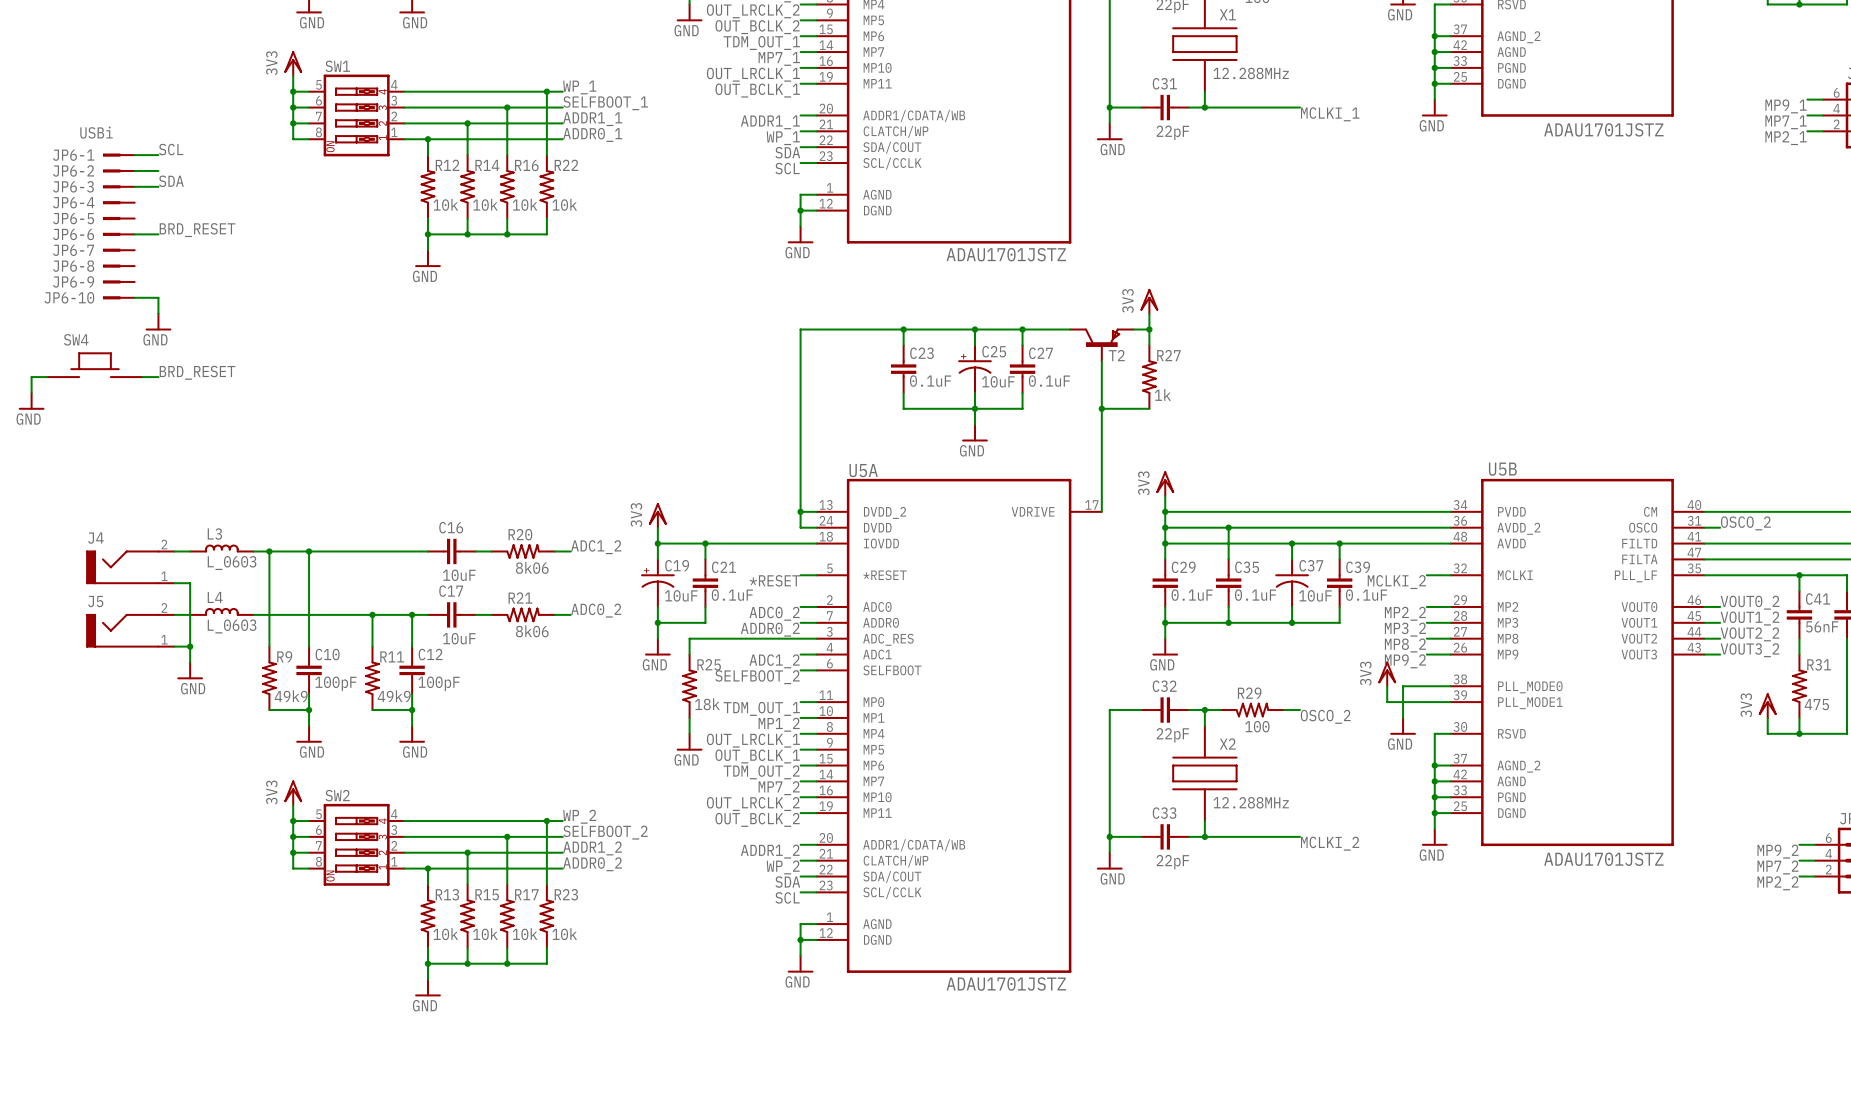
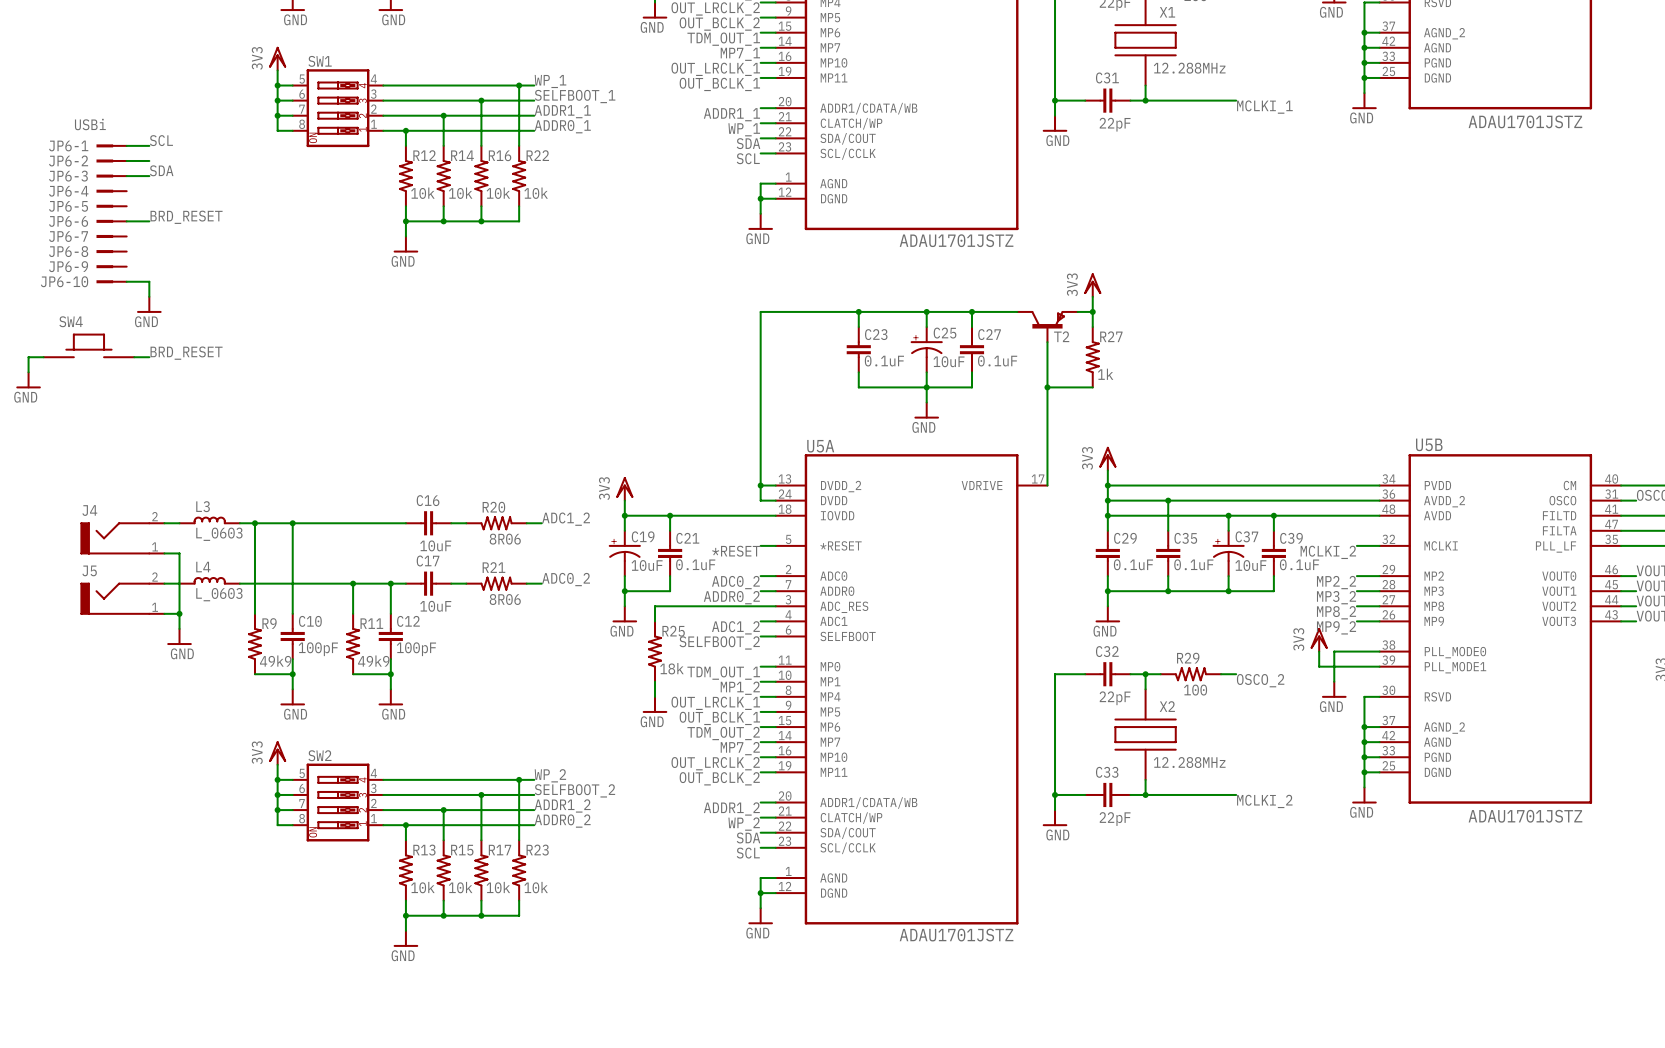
C37 symbol: [1275, 559, 1309, 607] -> [1212, 530, 1245, 577]
R20 value: 8k06 (532, 567) -> 8R06 (505, 539)
R21 value: 8k06 (532, 631) -> 8R06 (505, 599)

